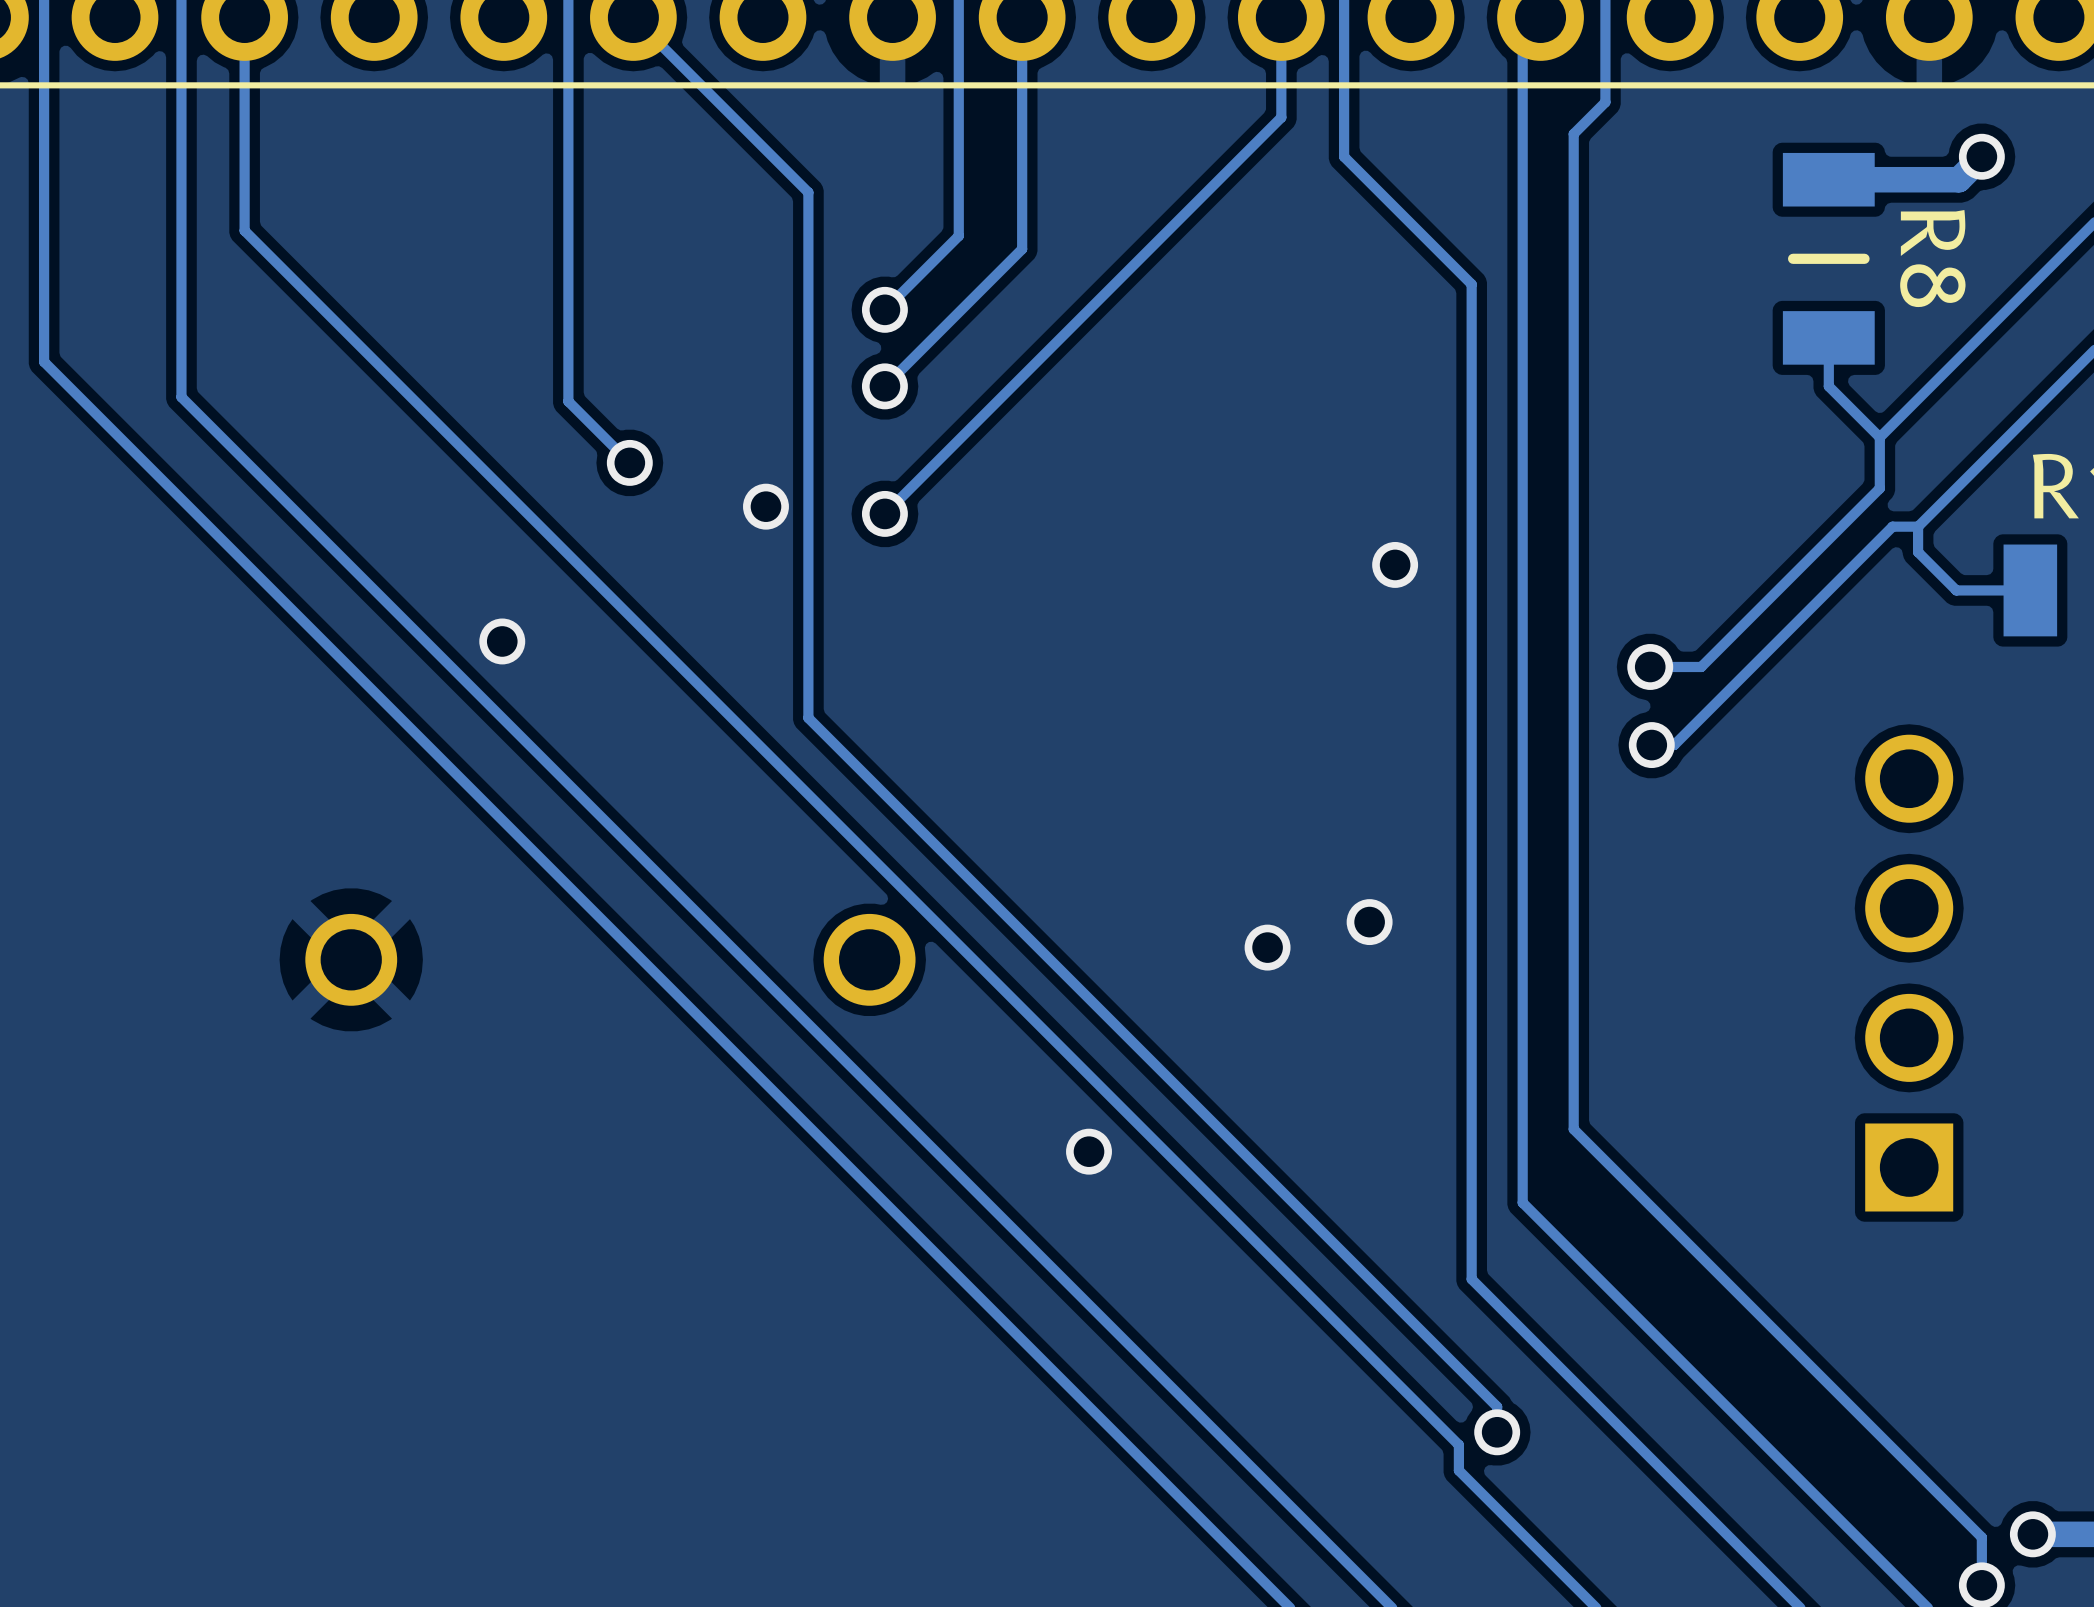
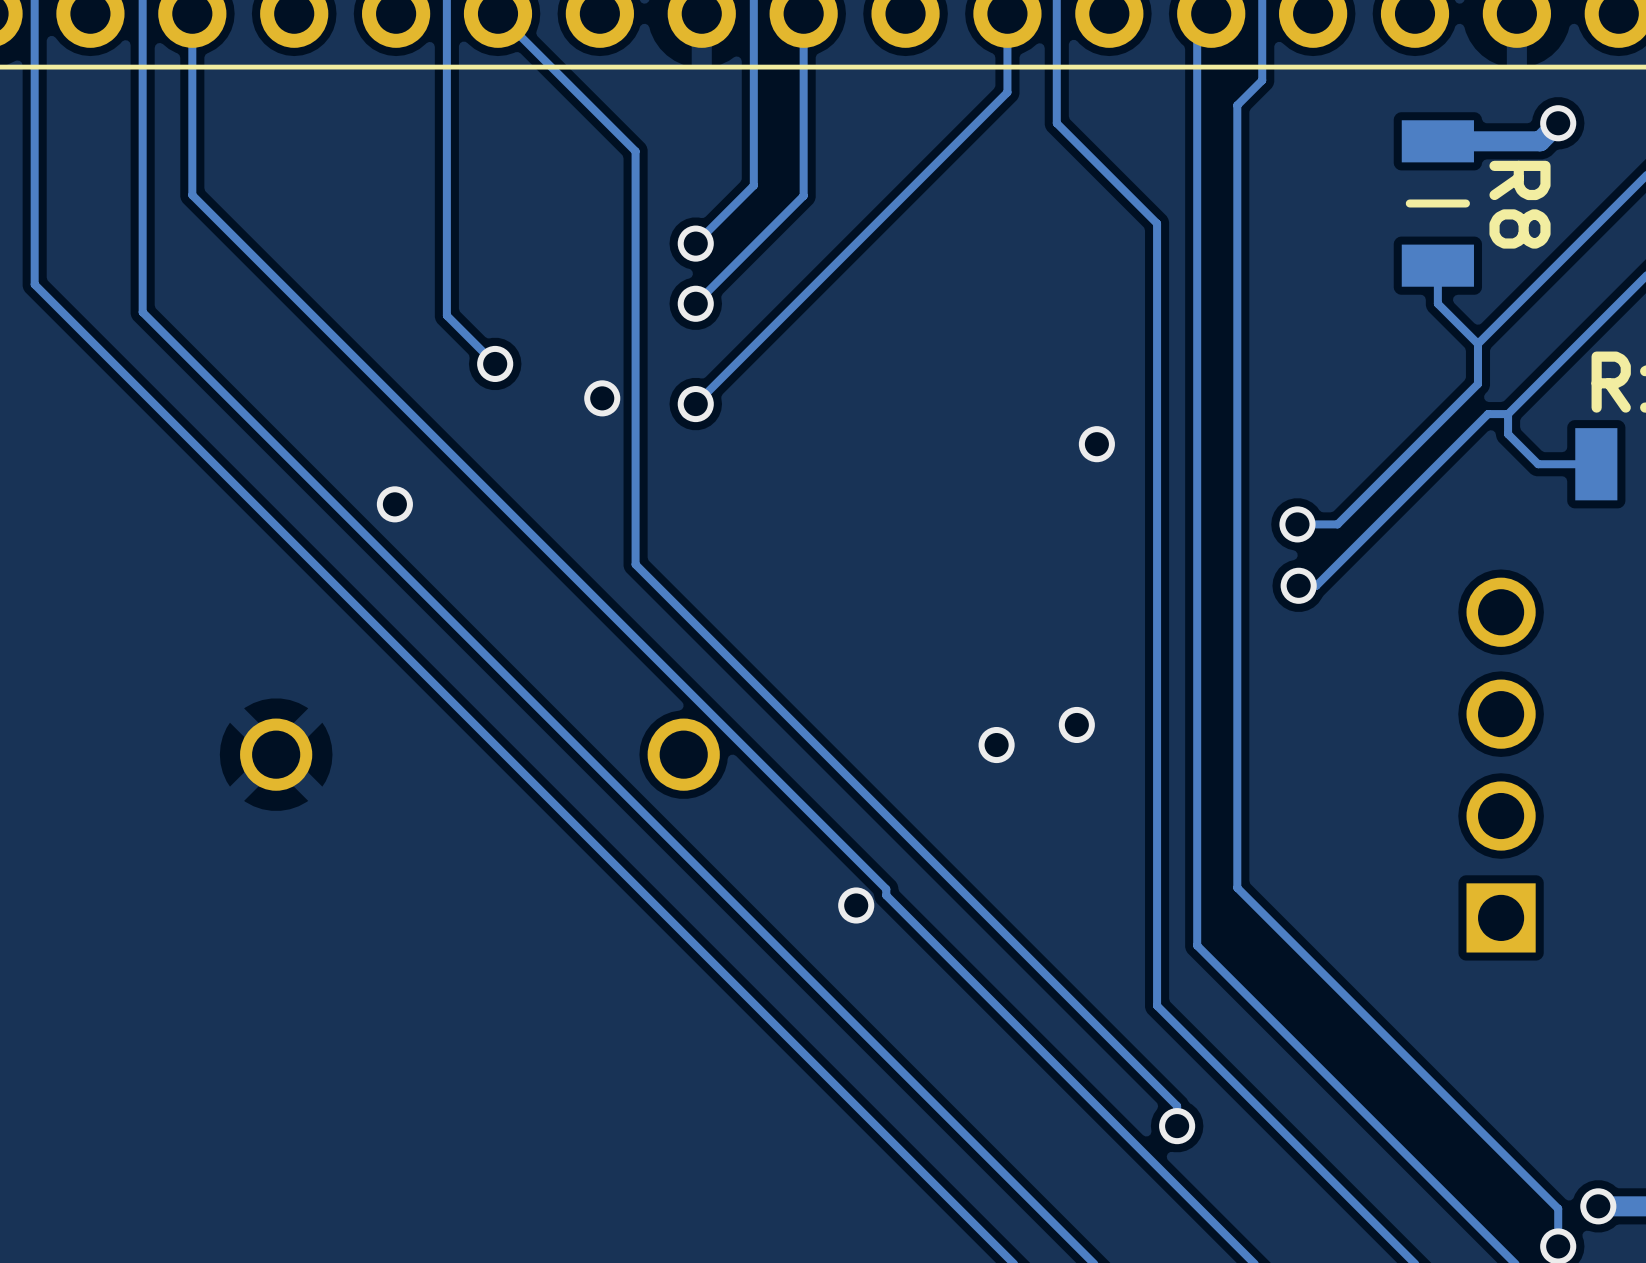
track: (244, 230) (1458, 1445) (1458, 1470) -> (192, 181) (192, 195) (886, 889) (886, 895) (1147, 1156)

